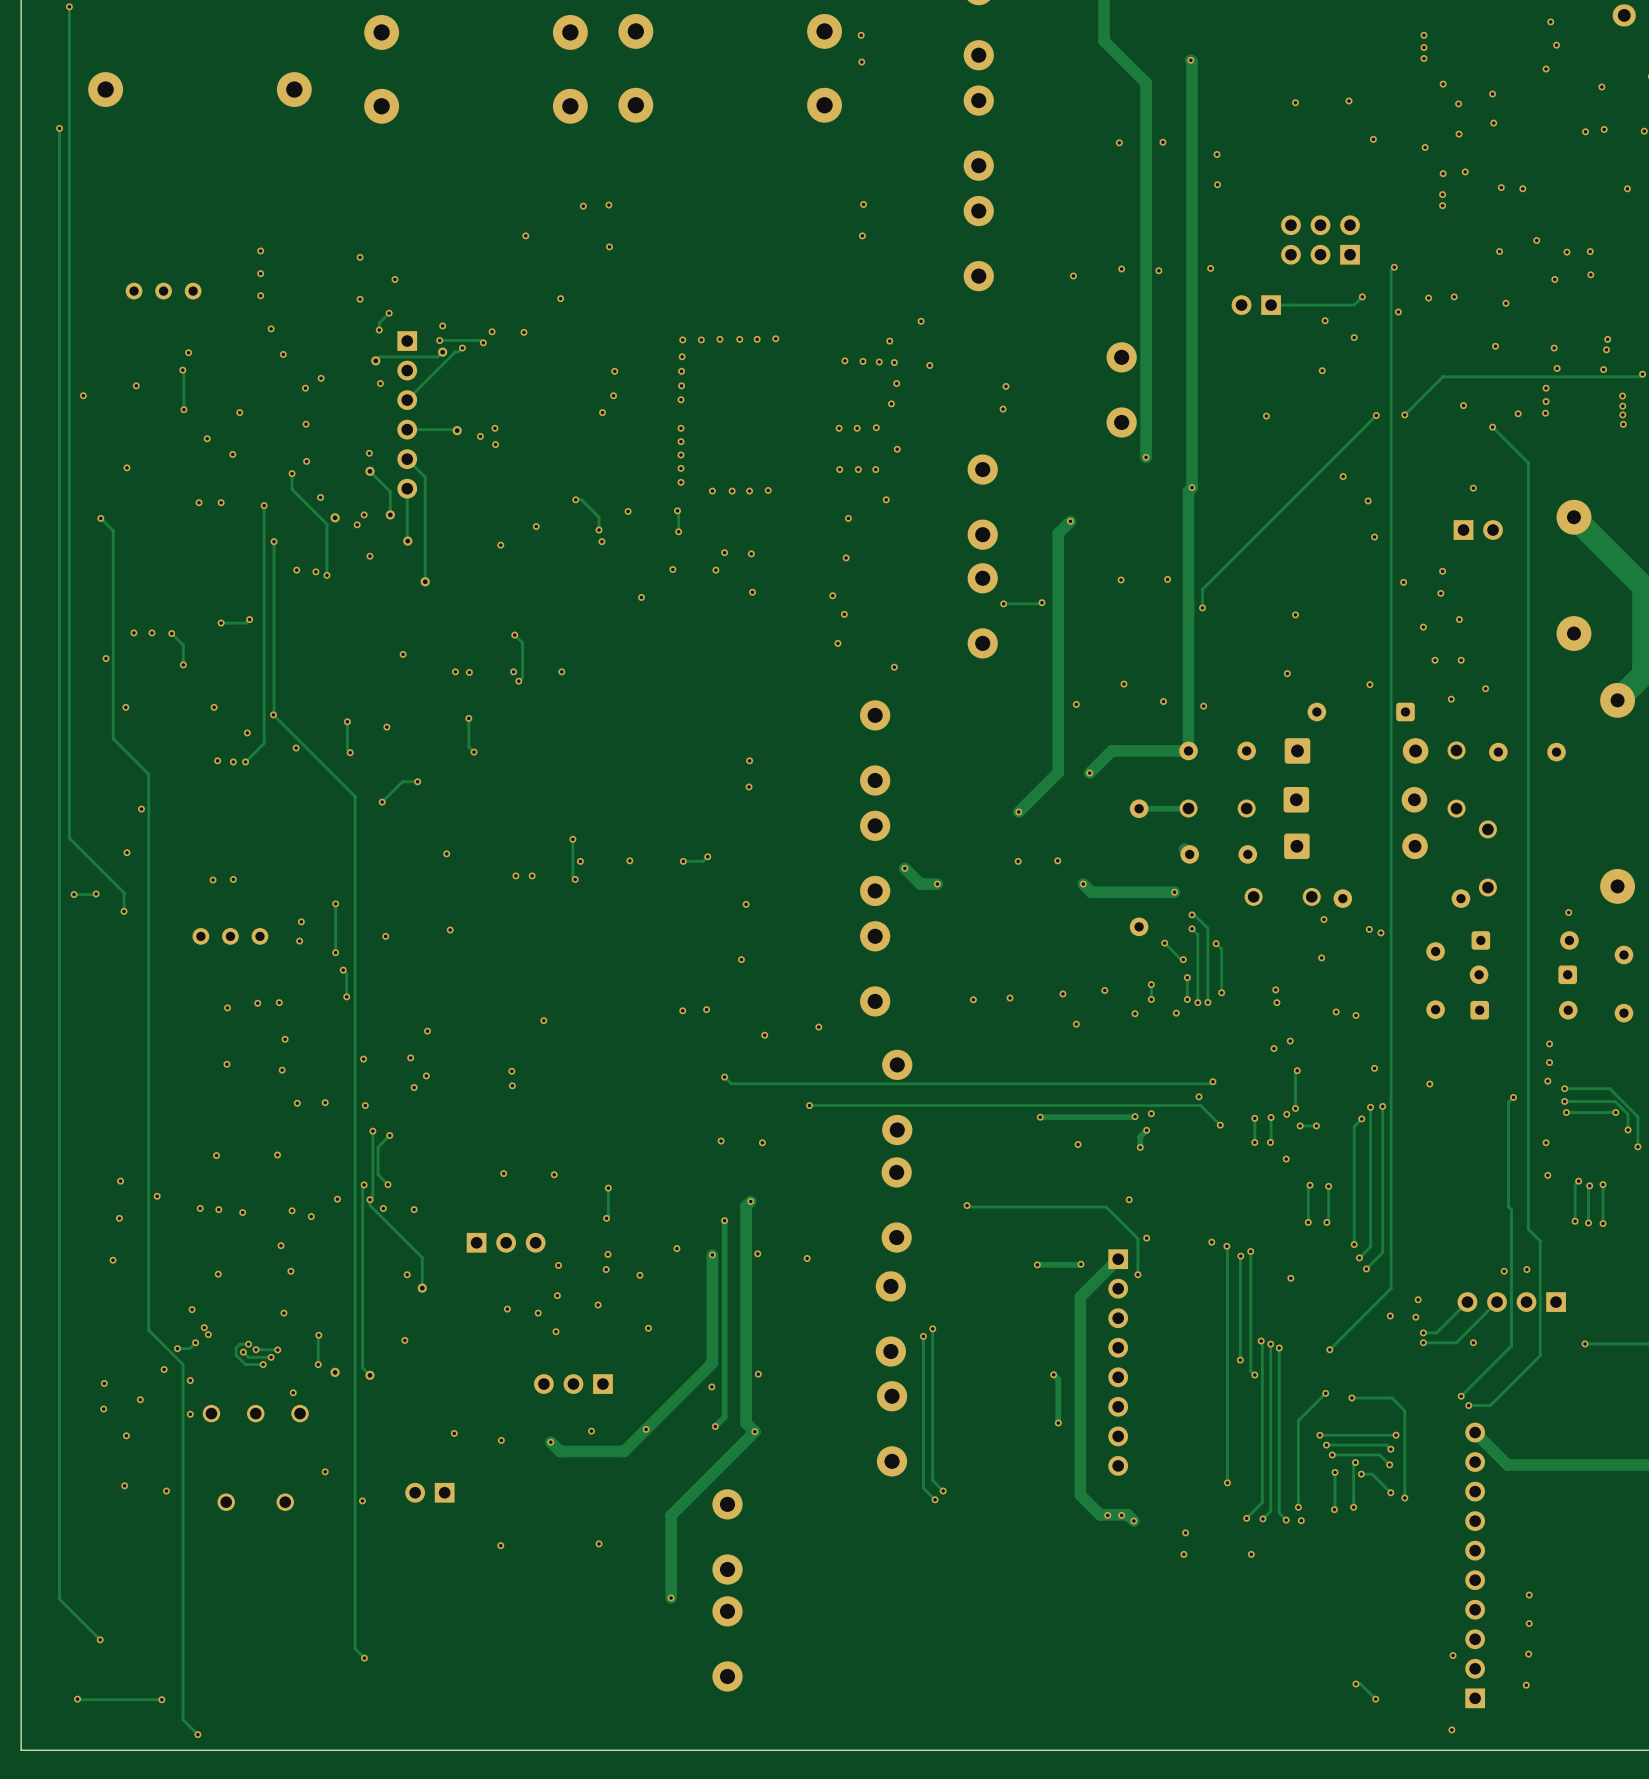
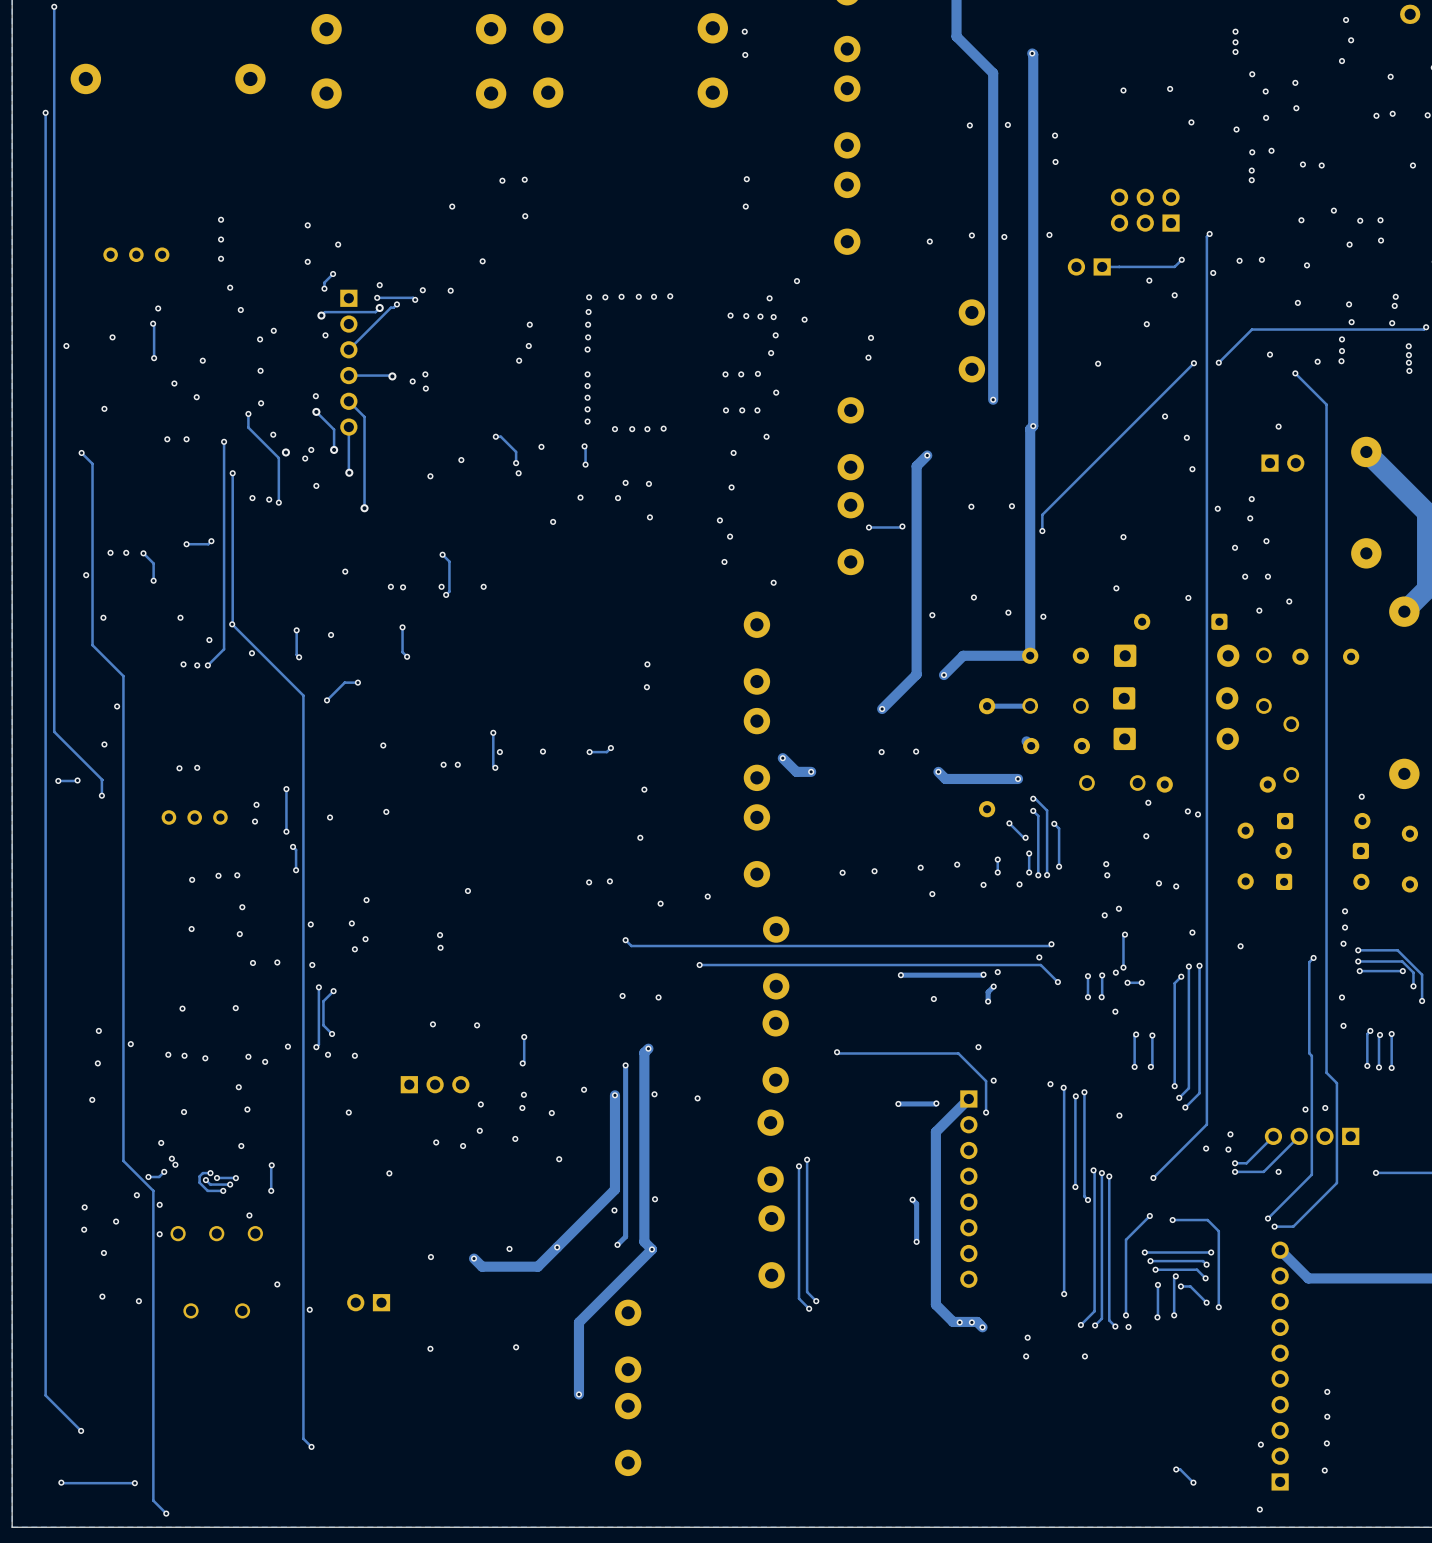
track: (364, 1184) (362, 1368) (369, 1375) -> none
via: (364, 1184) -> none
track: (369, 1199) (369, 1205) (422, 1257) (422, 1288) -> none
via: (422, 1288) -> none
via: (556, 1331) -> none
via: (404, 1340) -> none
via: none -> (389, 1173)
via: (335, 1372) -> none
via: (369, 1375) -> none
part: (573, 1384) -> none
via: (454, 1433) -> none

